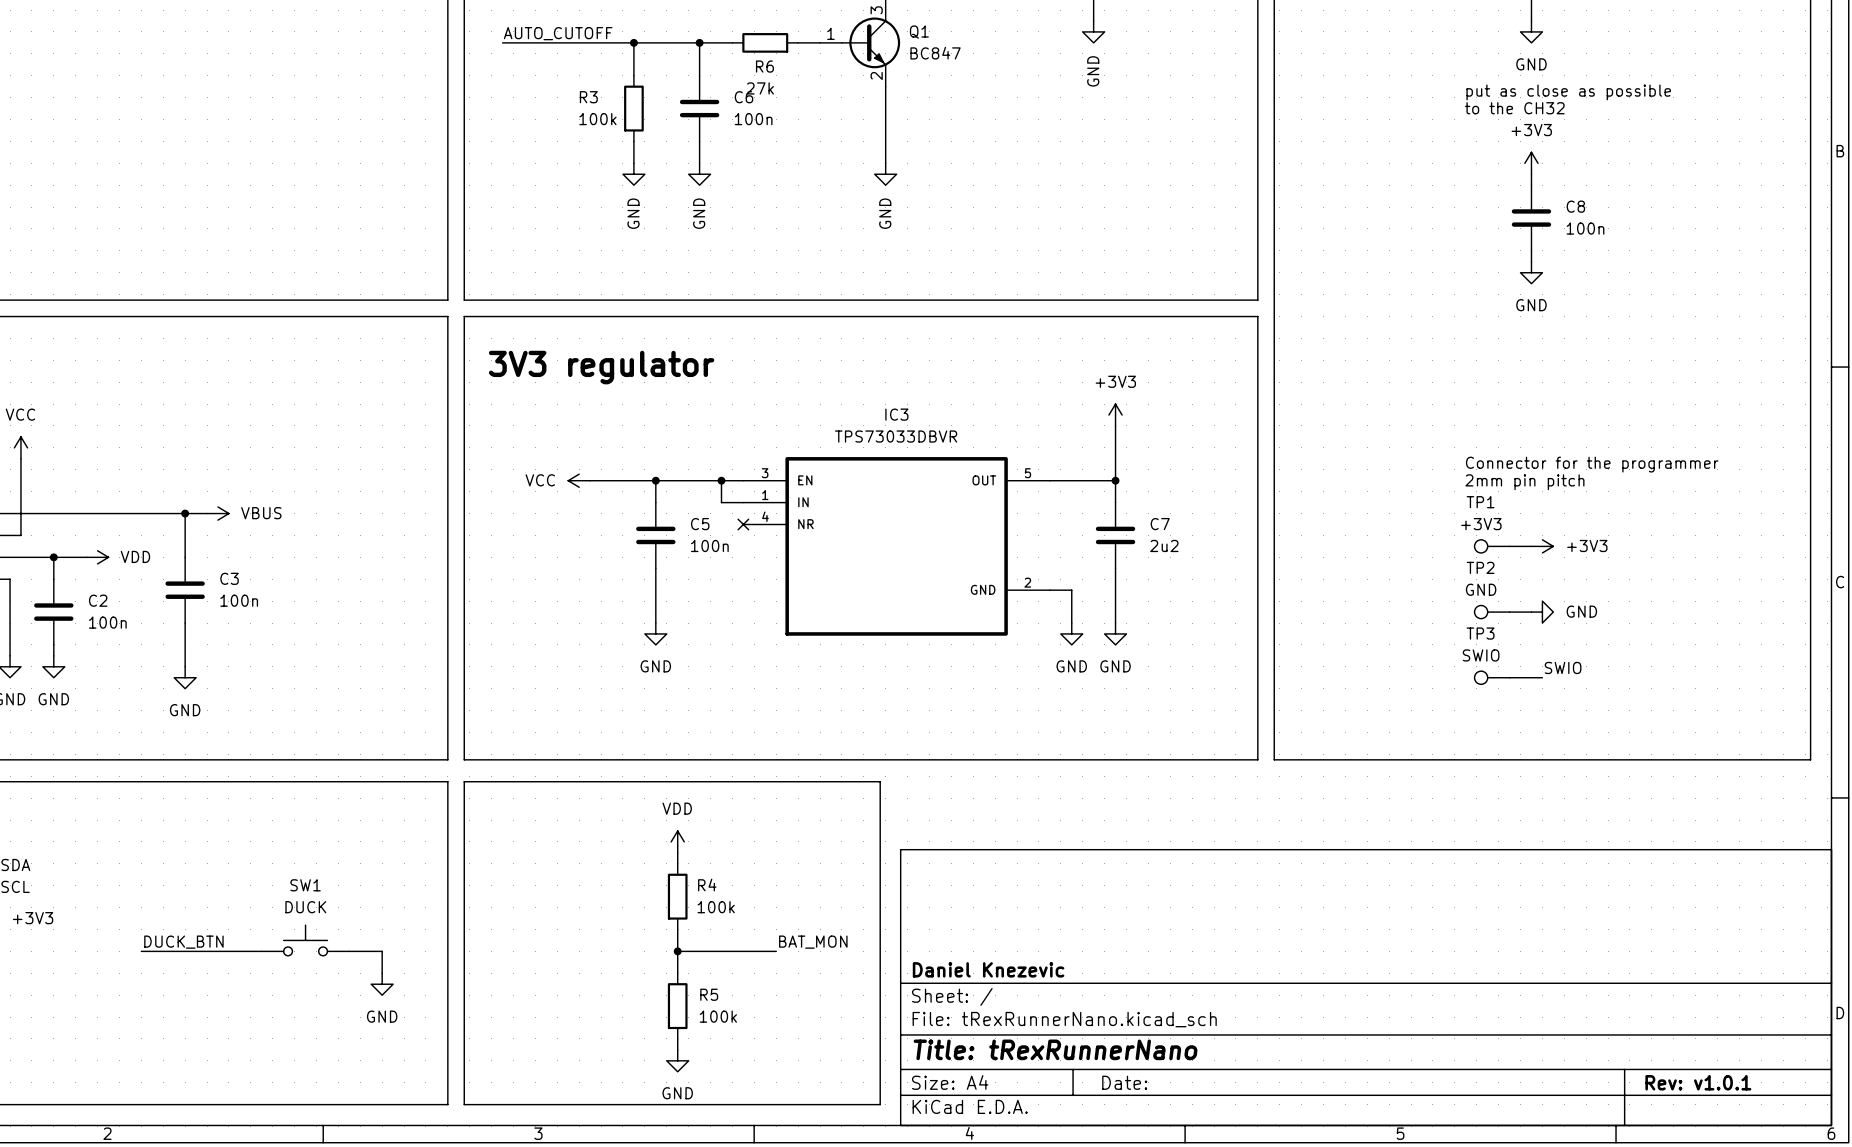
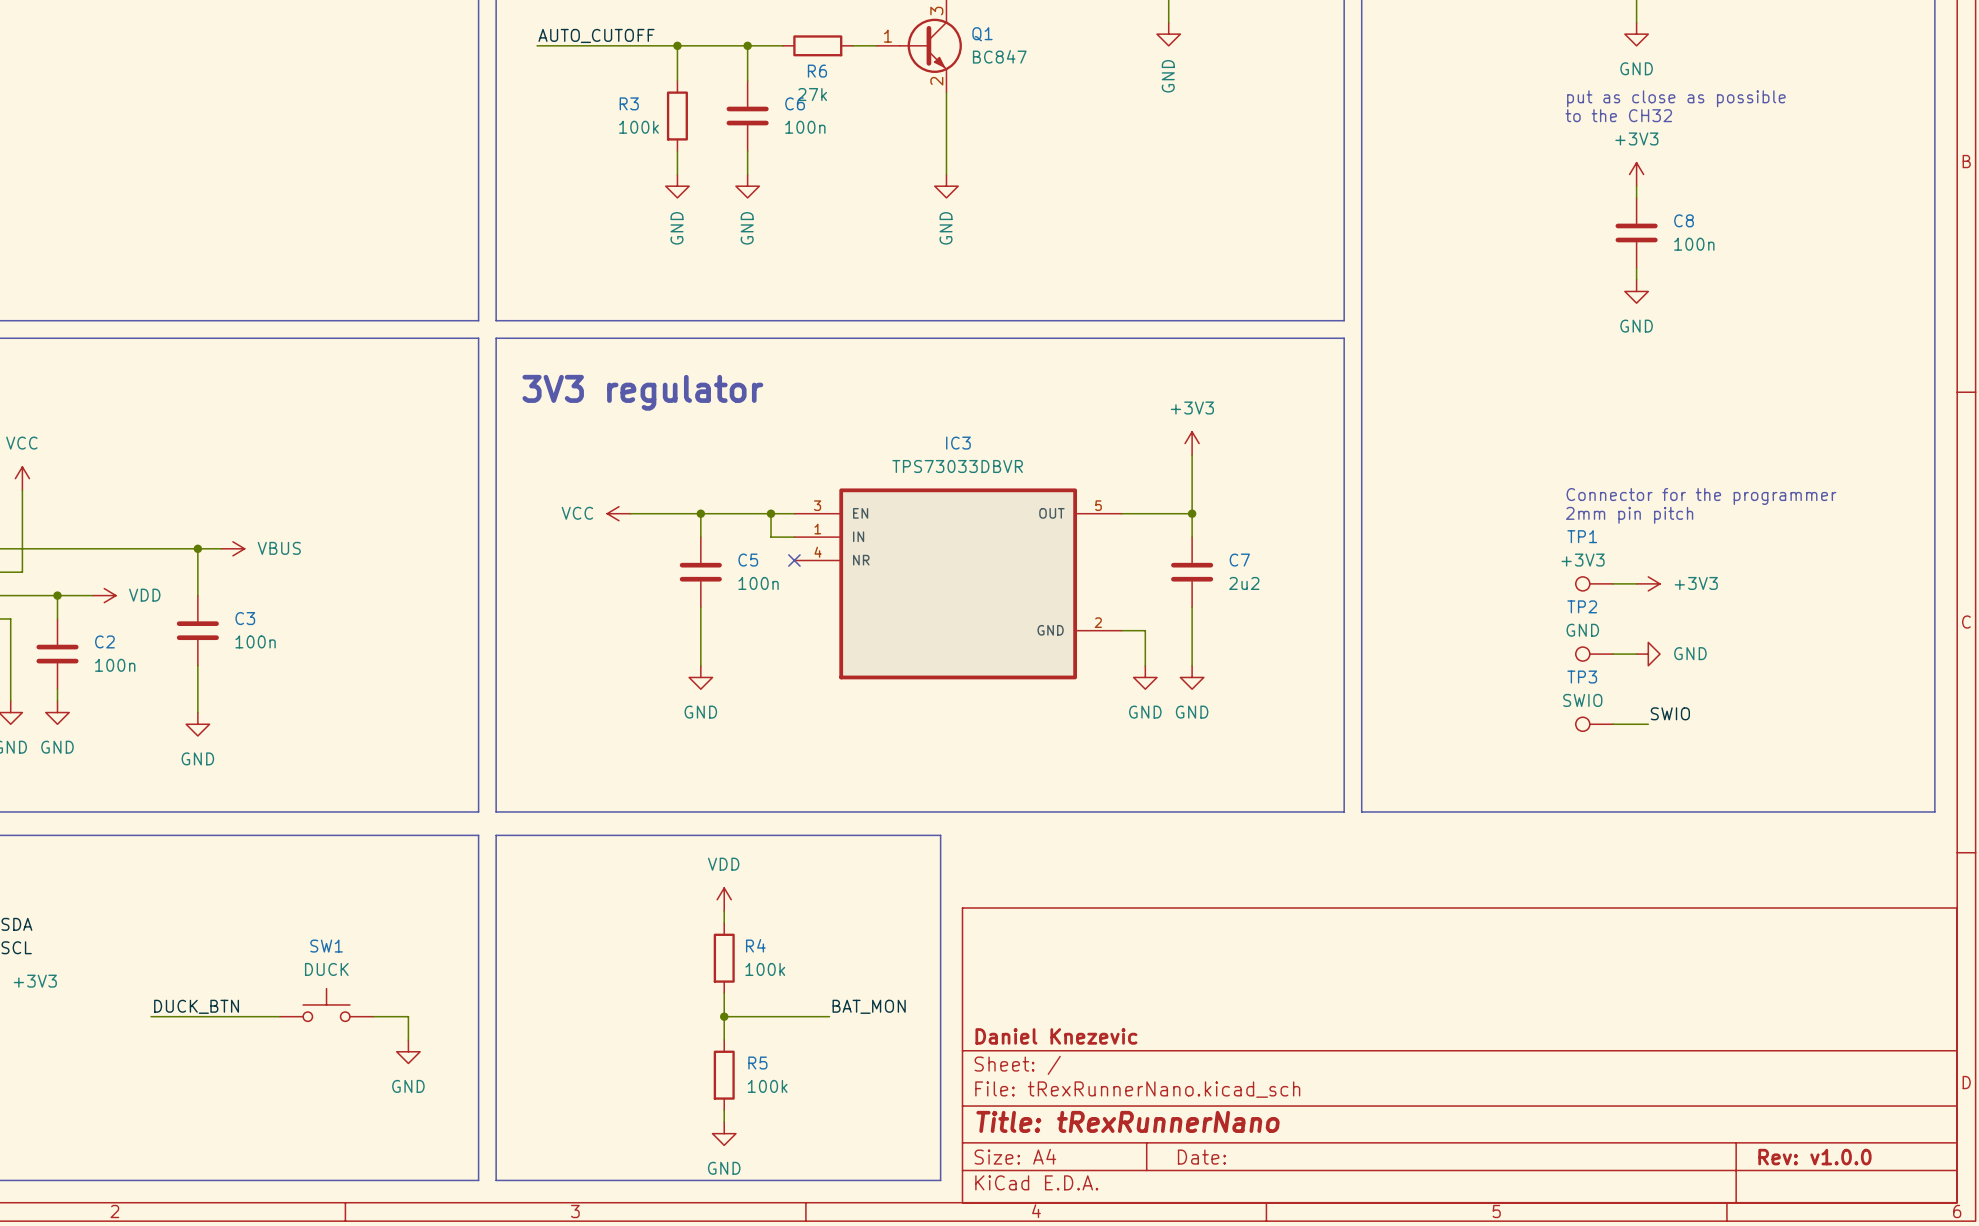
title block: Rev: v1.0.1 (1698, 1082) -> Rev: v1.0.0 (1814, 1157)

